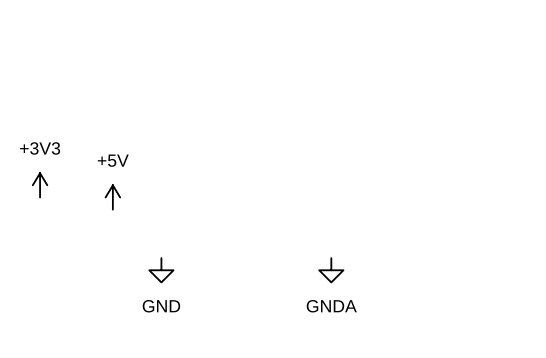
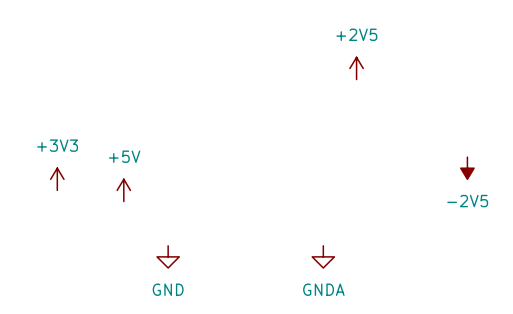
power symbol: none -> +2V5 (356, 68)
power symbol: none -> -2V5 (467, 168)

